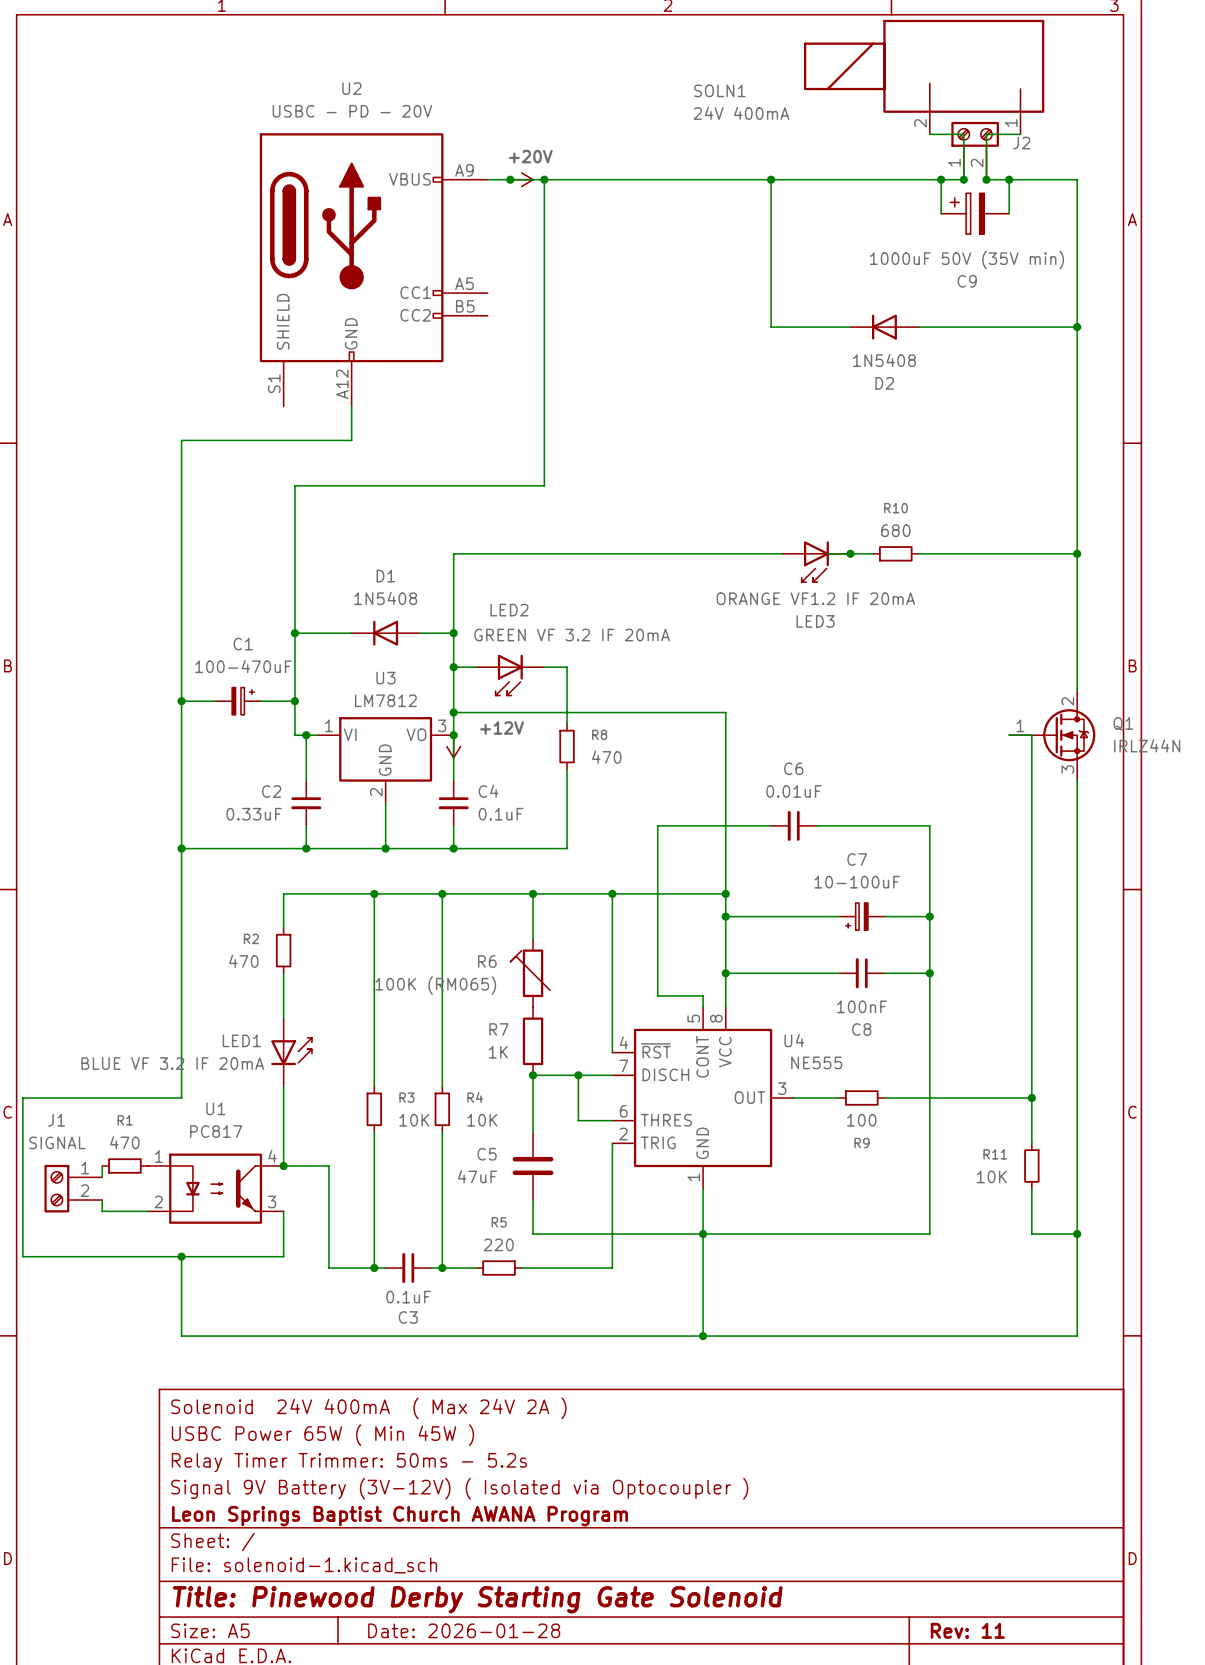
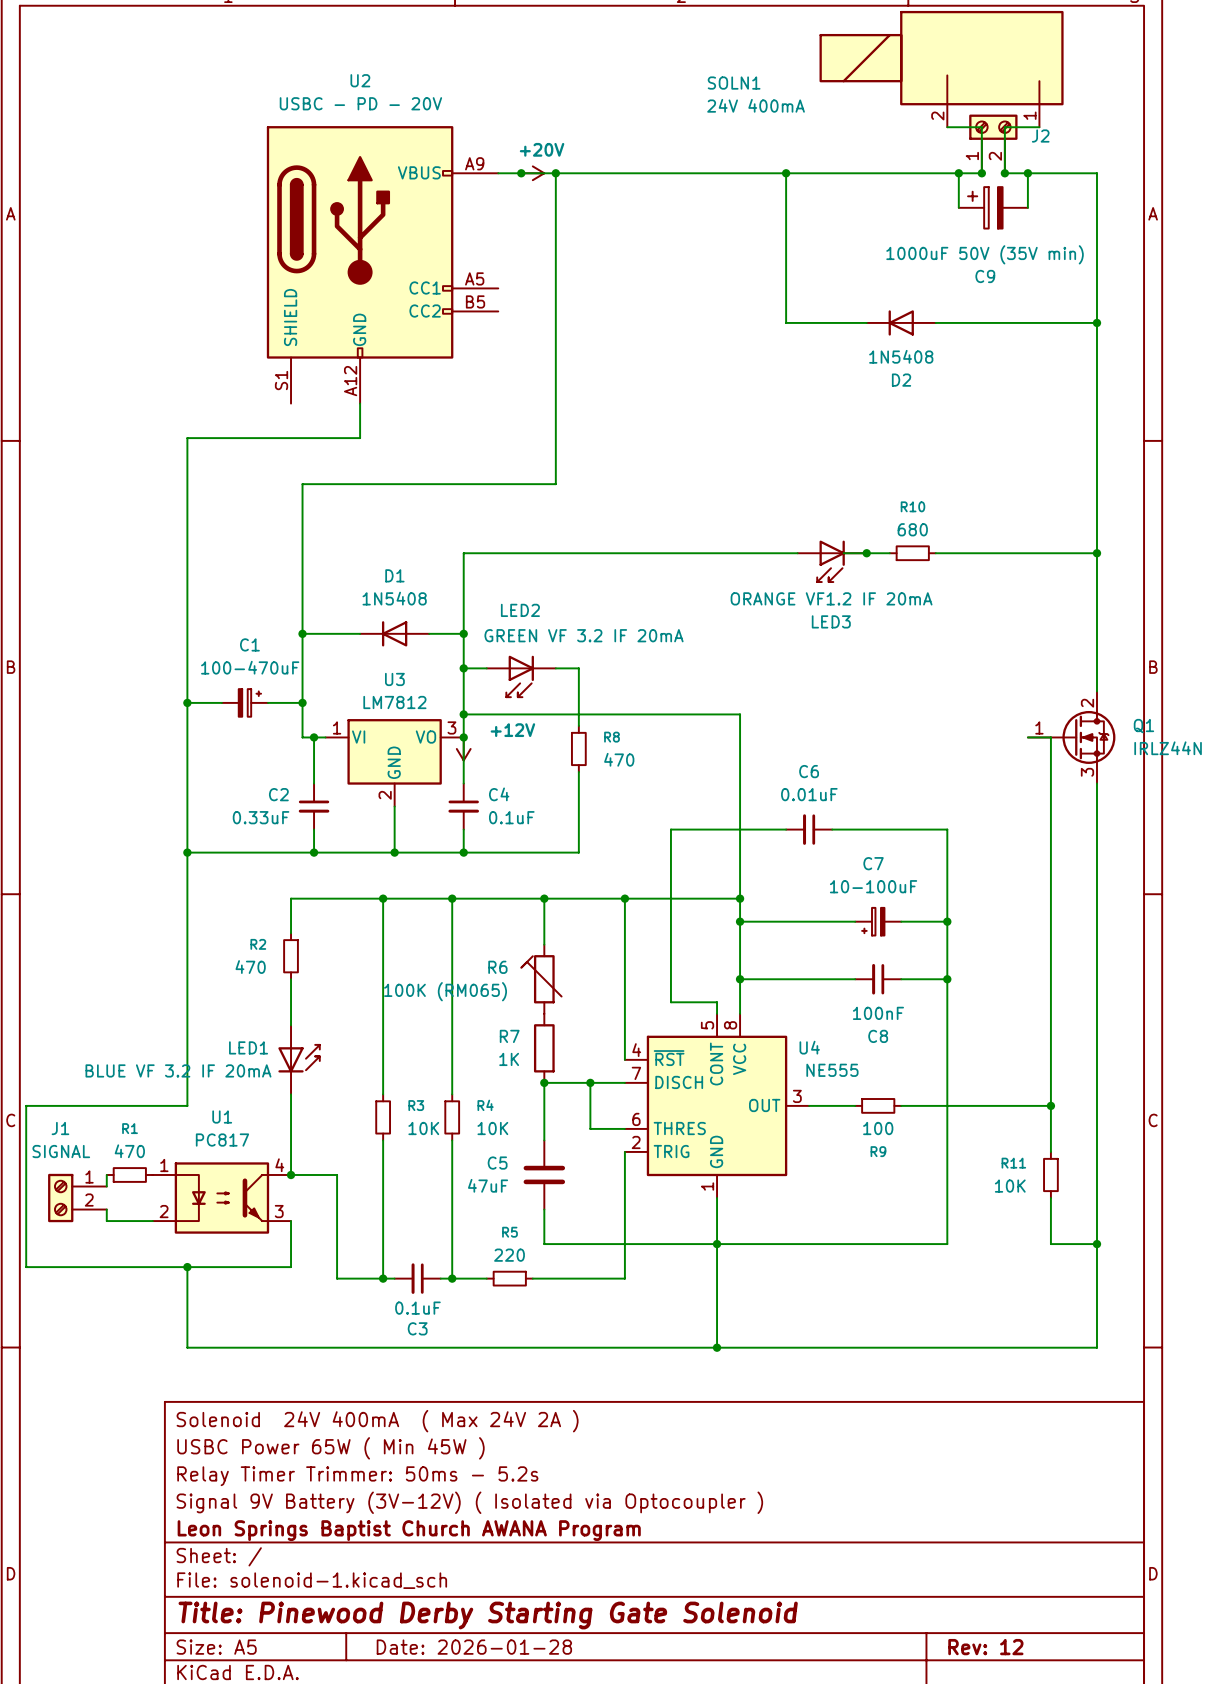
title block: Rev: 11 (967, 1630) -> Rev: 12 (985, 1647)

